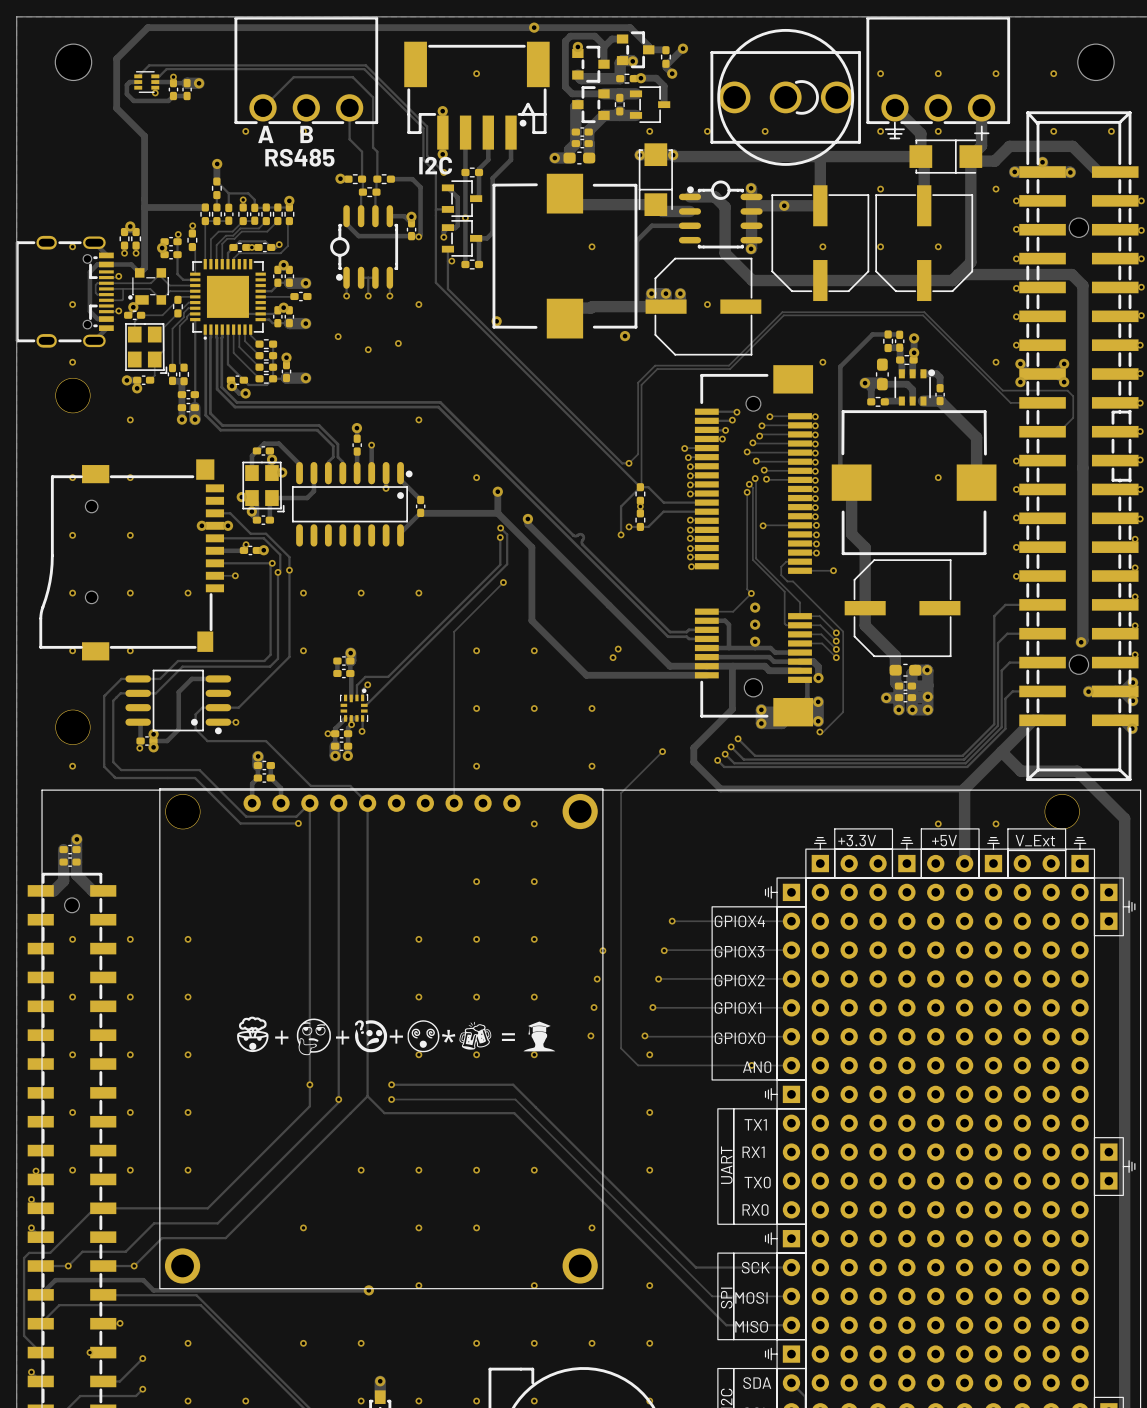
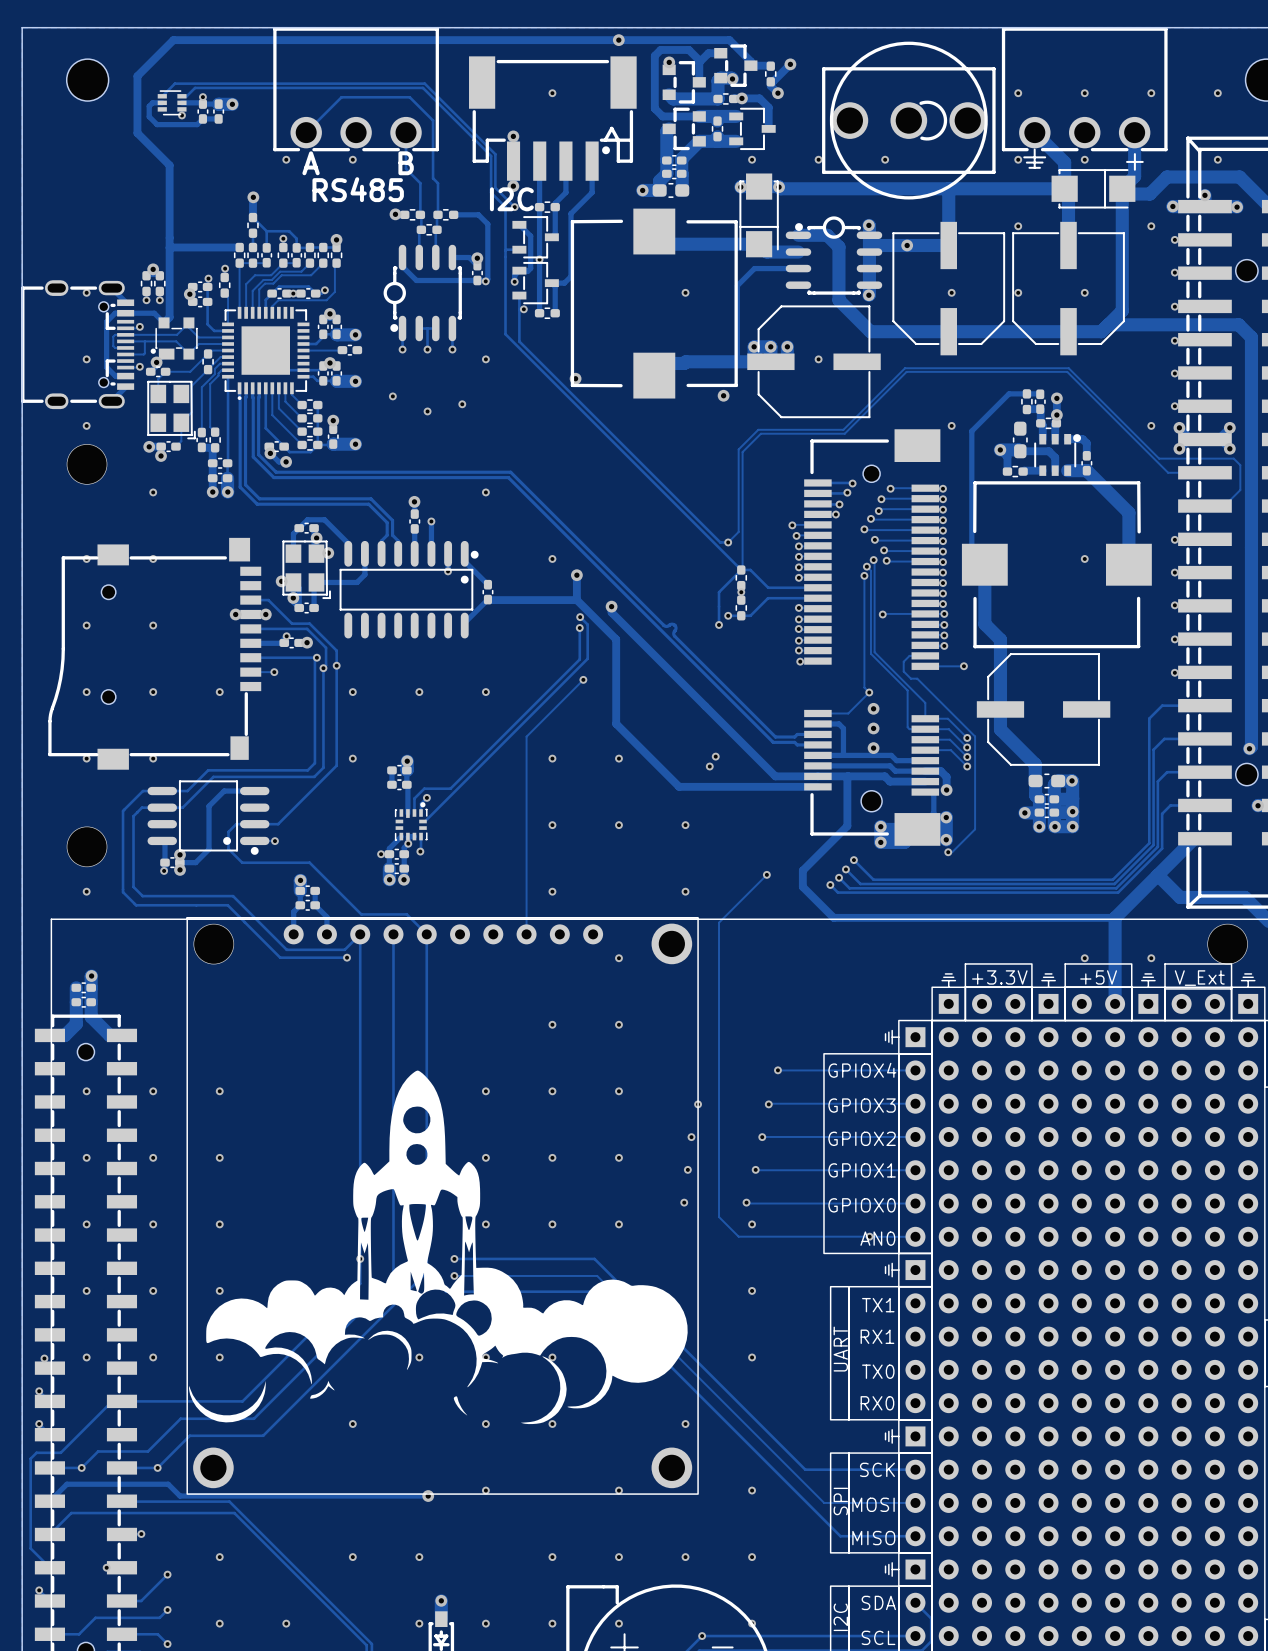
drawing: none -> [189, 1070, 688, 1425]
drawing: [237, 1016, 556, 1056] -> none

